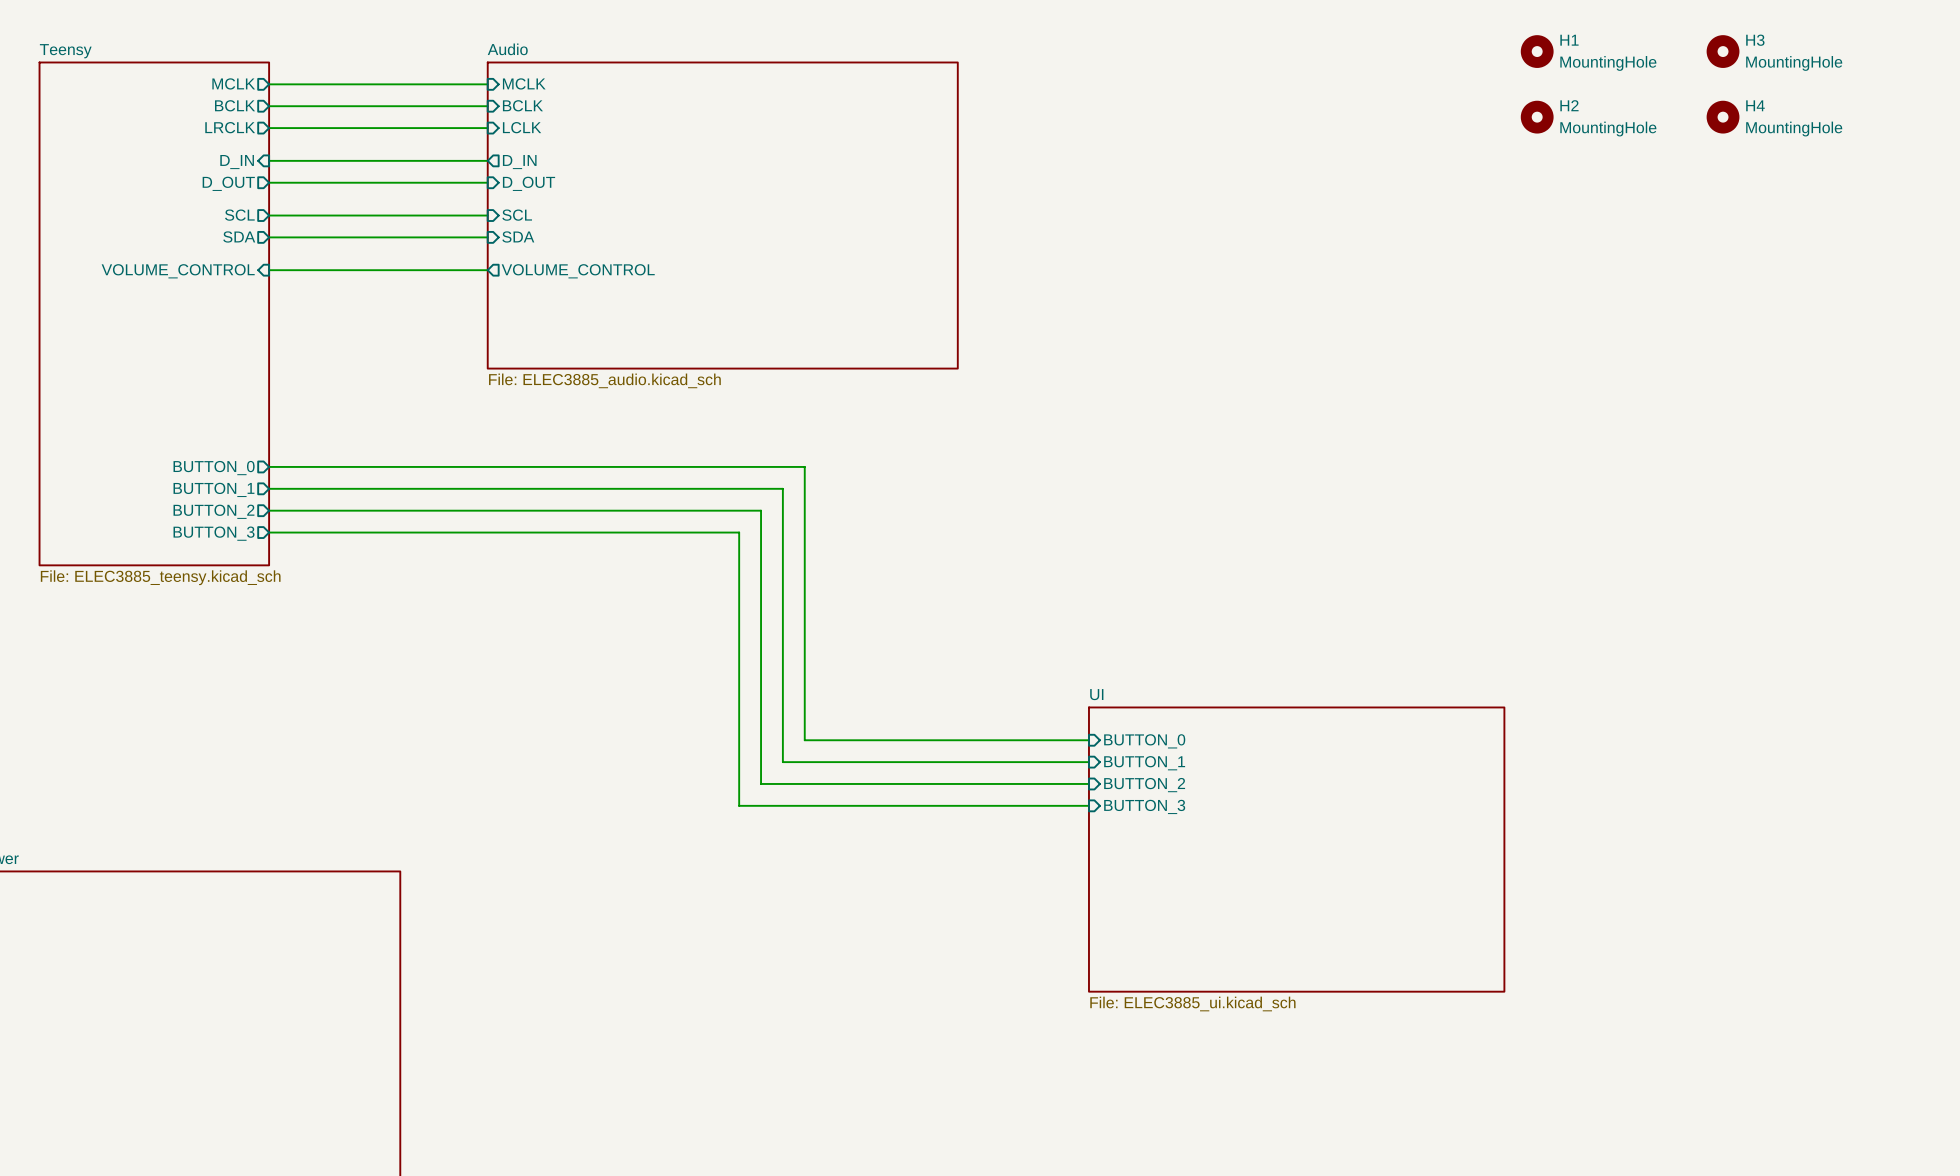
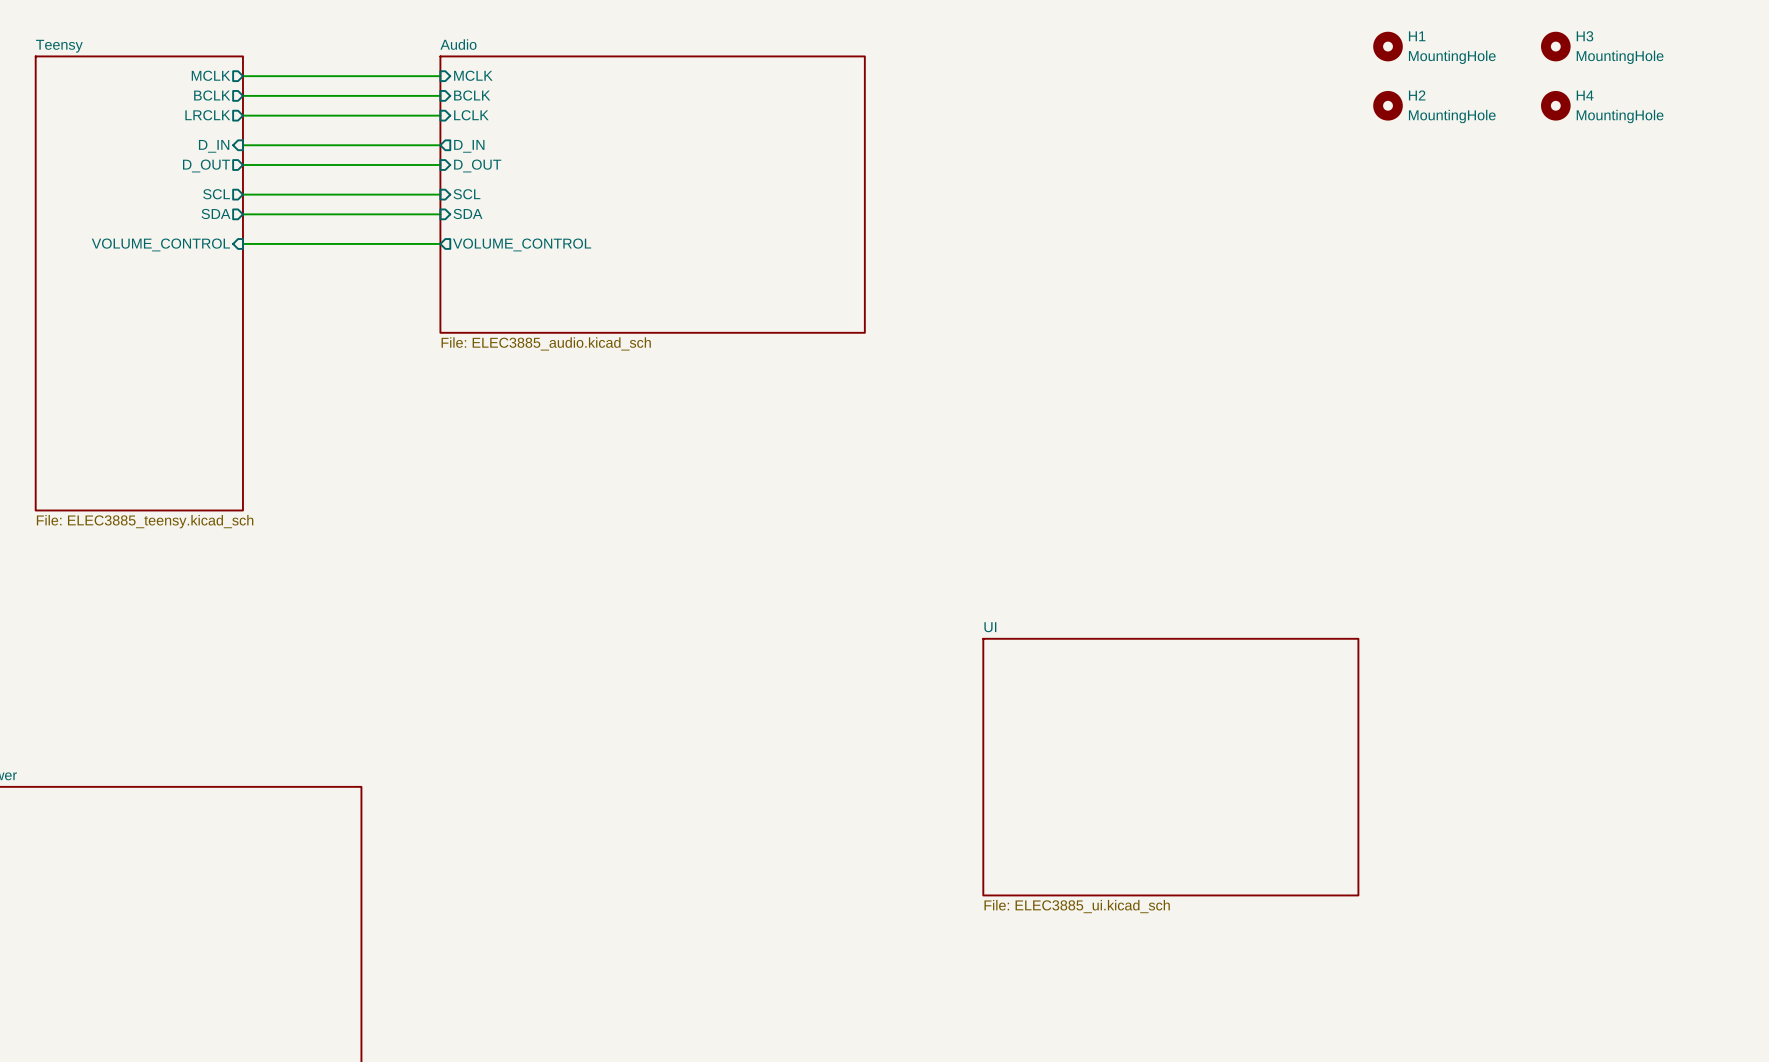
wire: (269, 466) (804, 466) (804, 740) (1088, 740) -> none
sheet pin: BUTTON_0 (214, 468) -> none
wire: (269, 488) (782, 488) (782, 762) (1088, 762) -> none
sheet pin: BUTTON_1 (213, 489) -> none
wire: (269, 510) (761, 510) (761, 783) (1088, 783) -> none
sheet pin: BUTTON_2 (213, 511) -> none
wire: (269, 532) (739, 532) (739, 805) (1088, 805) -> none
sheet pin: BUTTON_3 (214, 533) -> none
sheet pin: BUTTON_0 (1144, 741) -> none
sheet pin: BUTTON_1 (1144, 763) -> none
sheet pin: BUTTON_2 (1144, 785) -> none
sheet pin: BUTTON_3 (1144, 806) -> none

